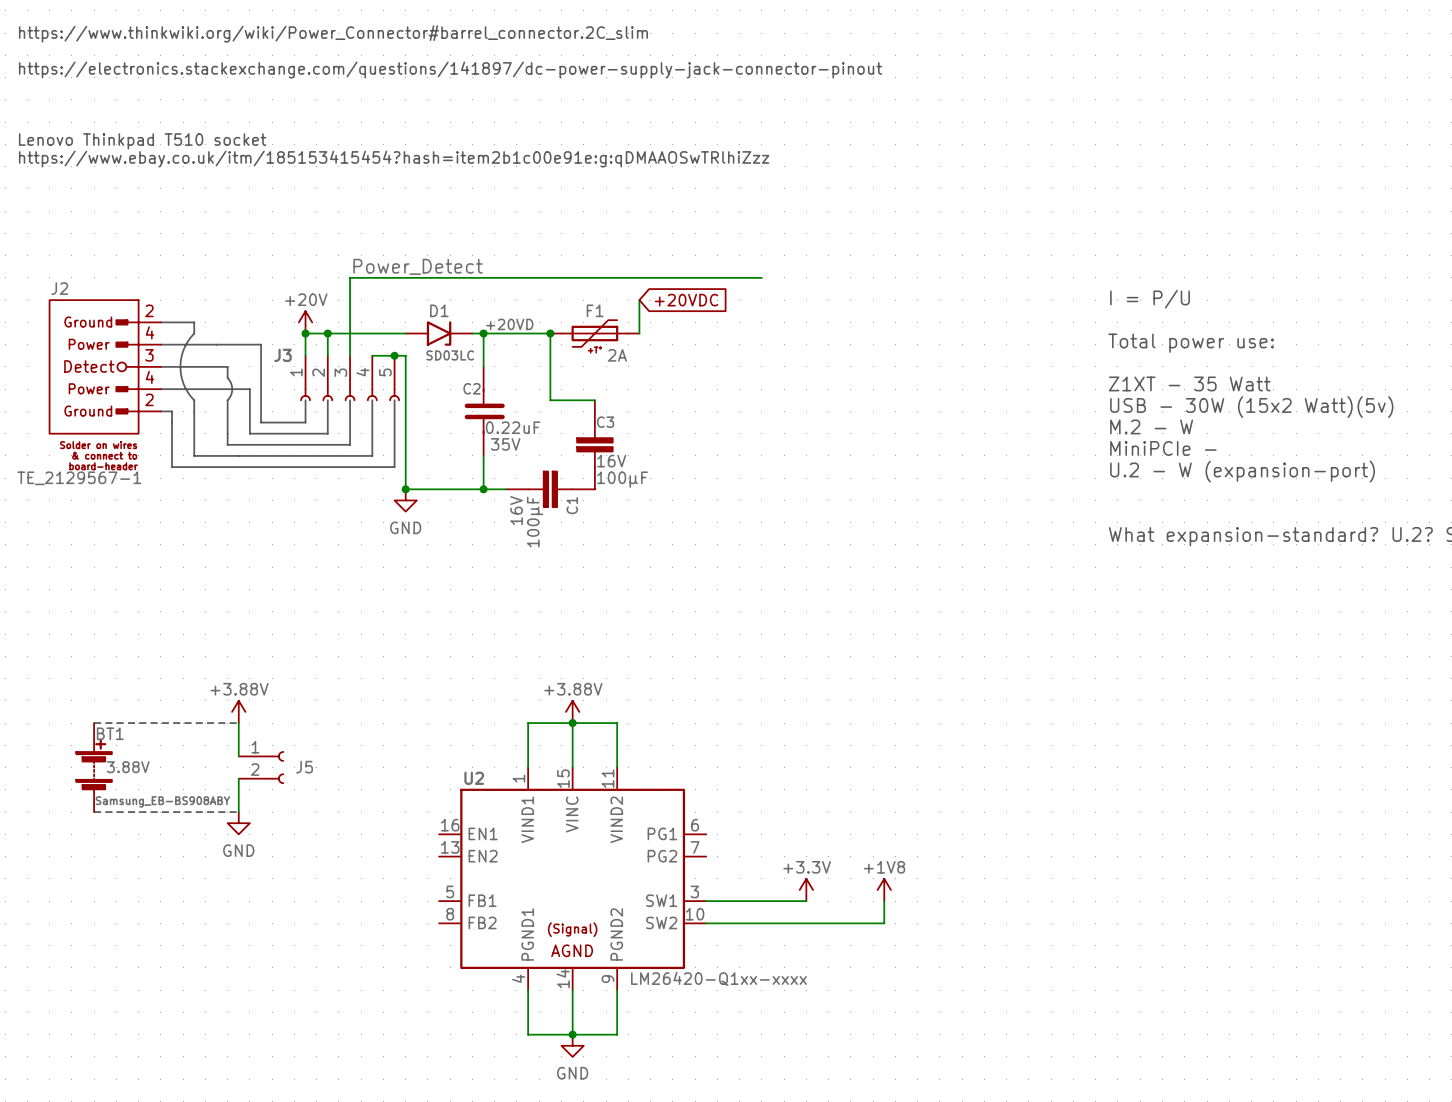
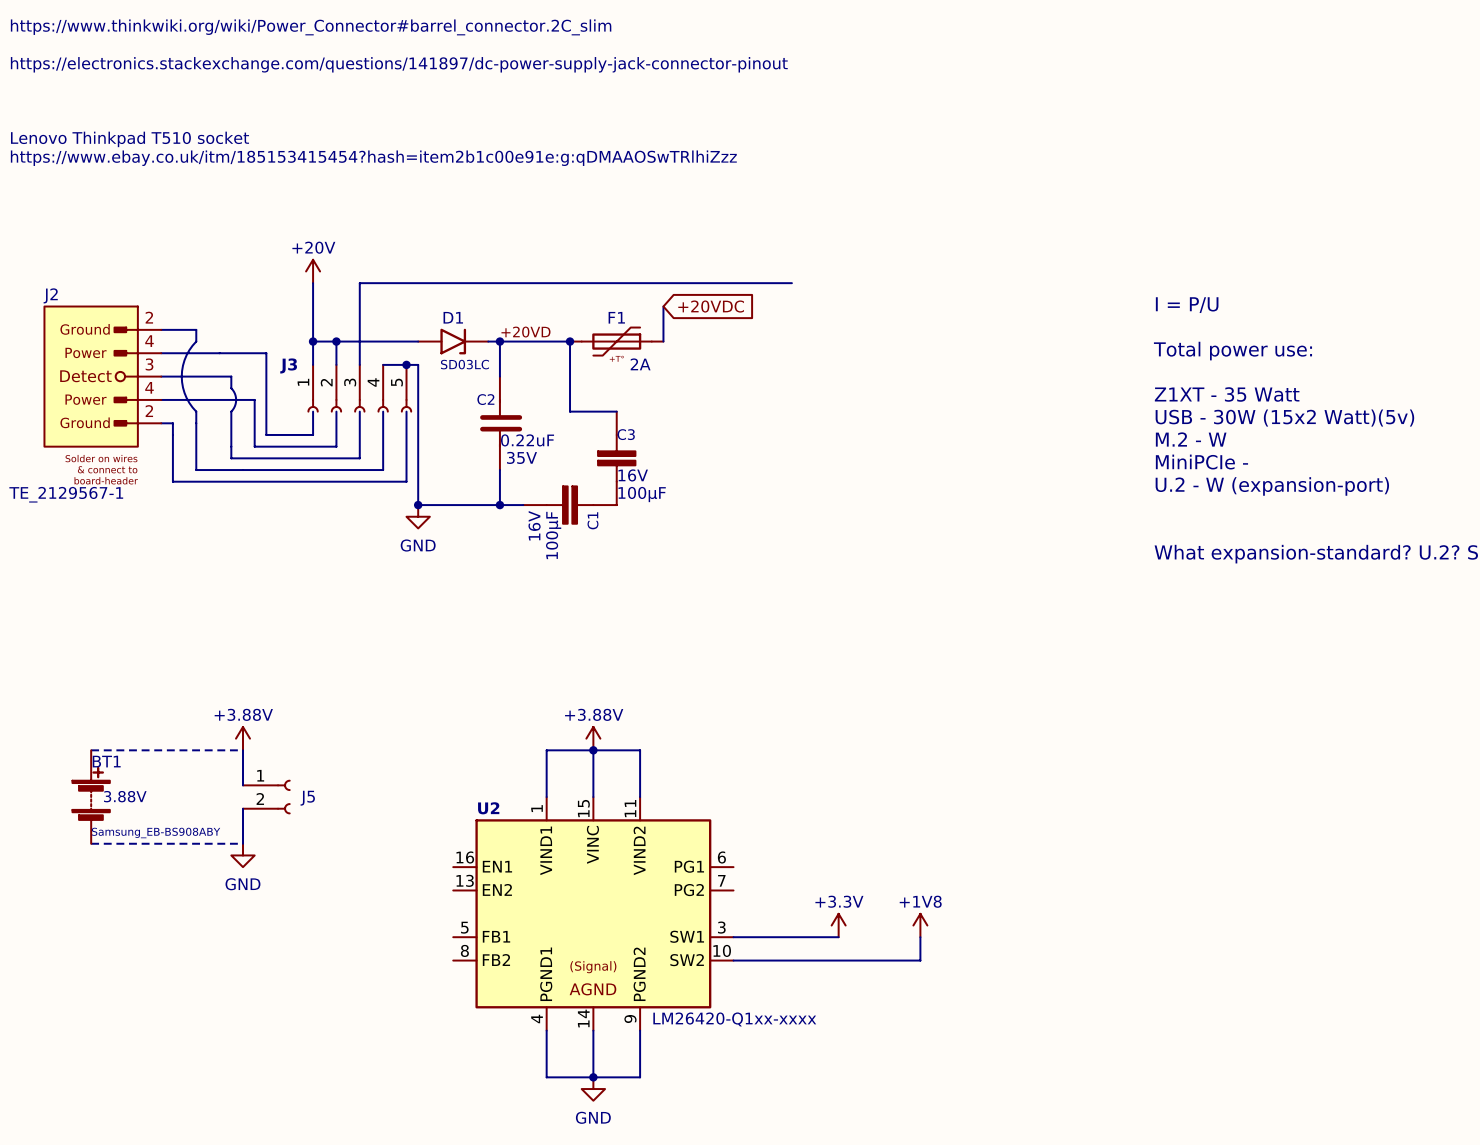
label: Power_Detect (418, 266) -> none
wire: none -> (313, 283) (313, 341)
power symbol position: +20V (305, 322) -> +20V (313, 271)

